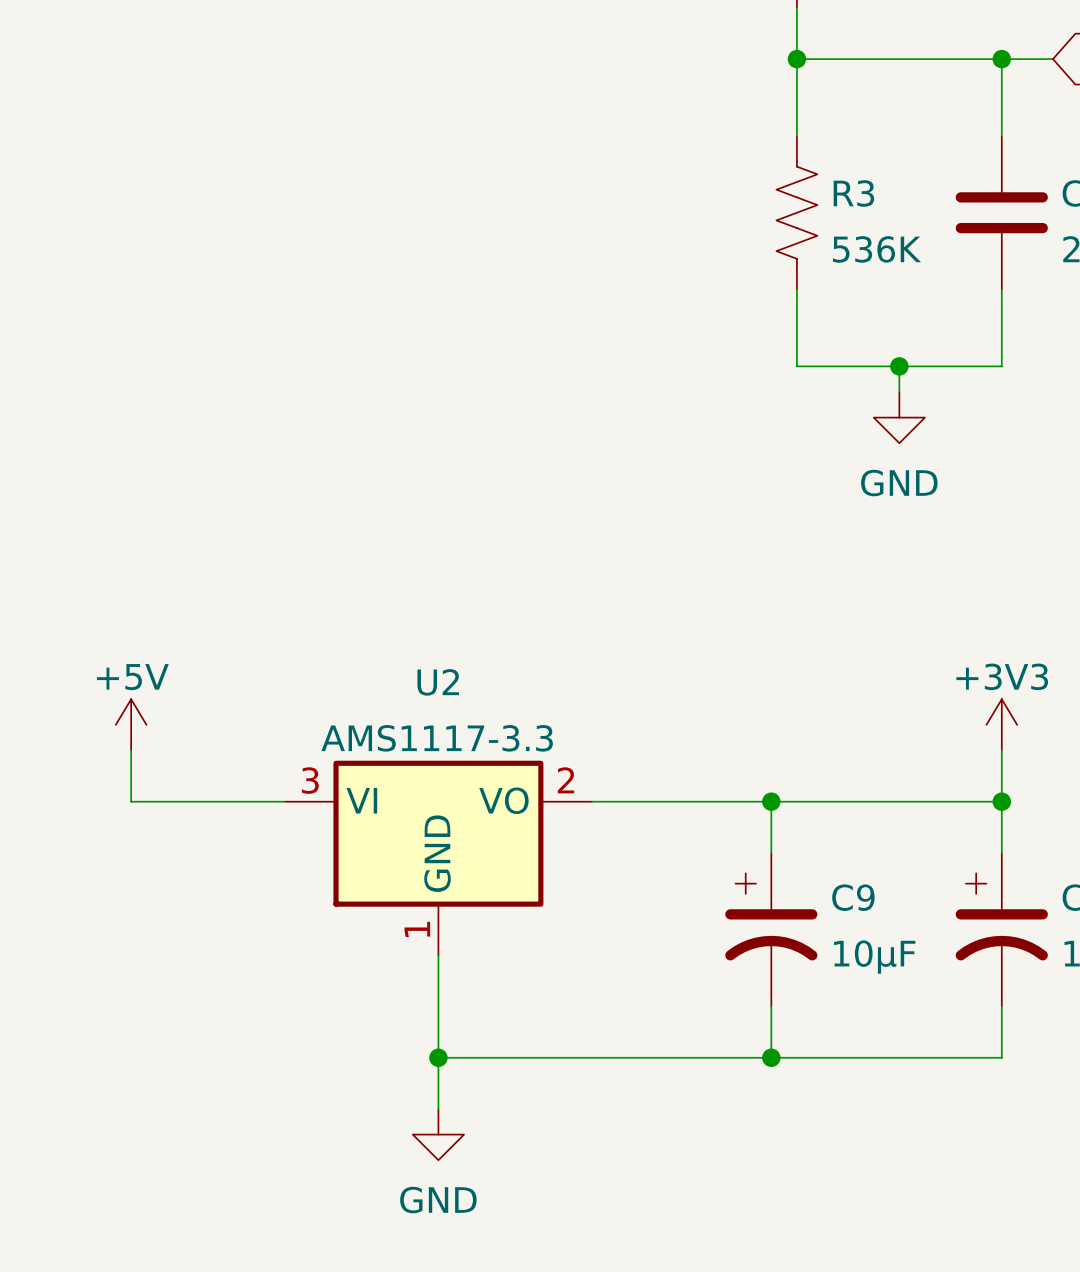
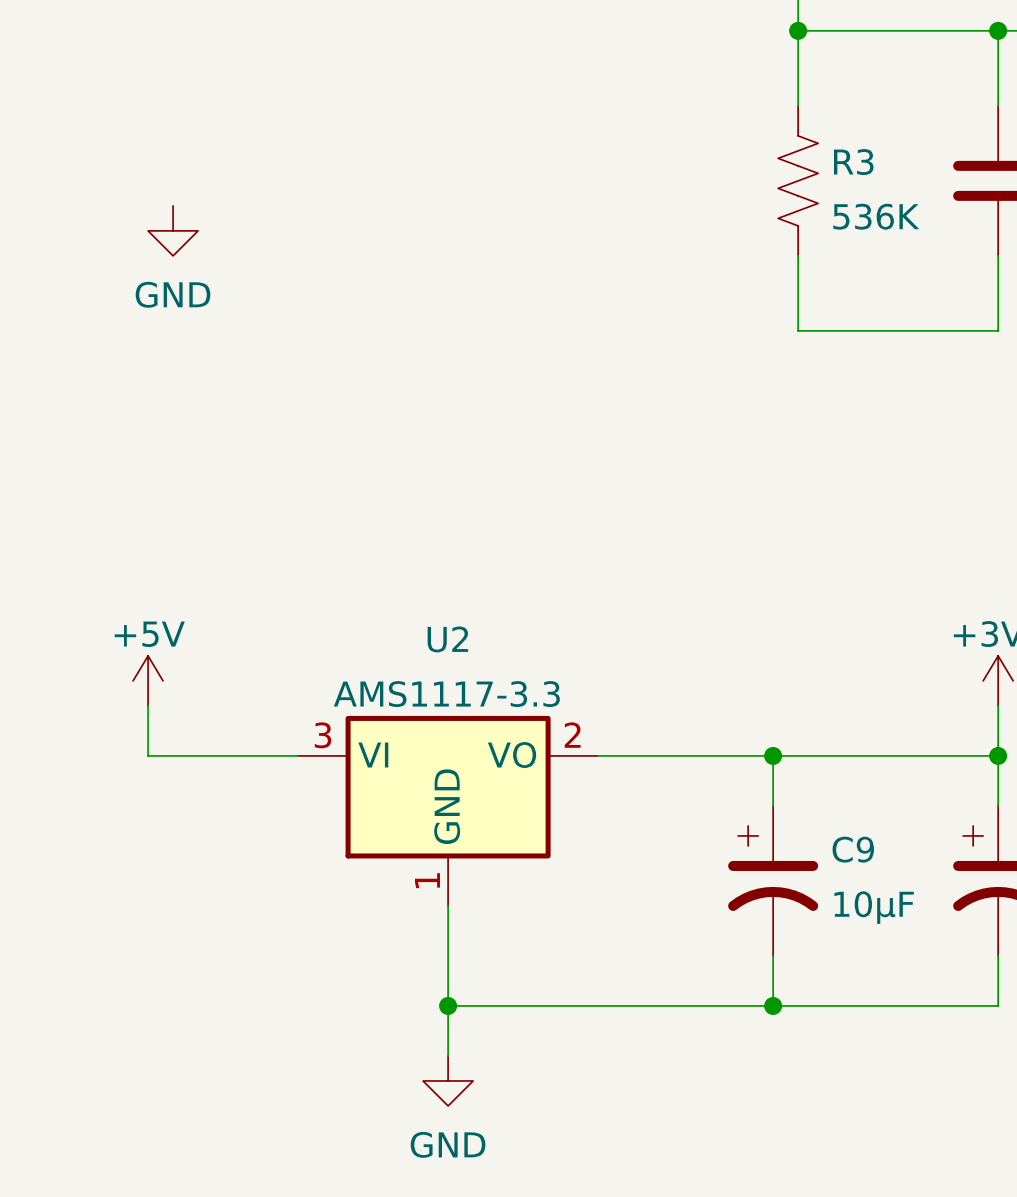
power symbol: none -> GND (173, 230)
wire: (899, 366) (899, 391) -> none
junction: (899, 366) -> none
power symbol: GND (899, 417) -> none

